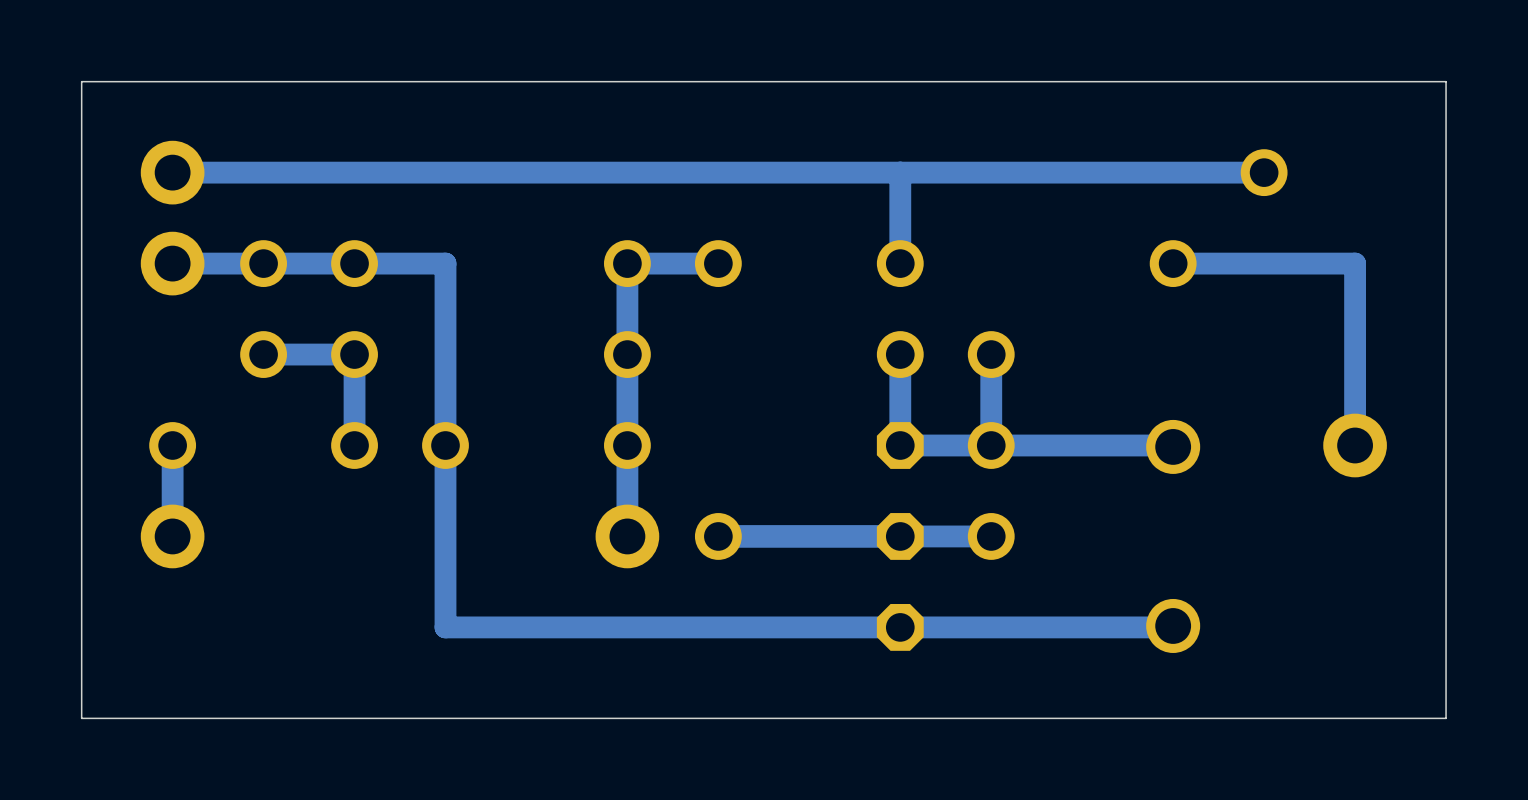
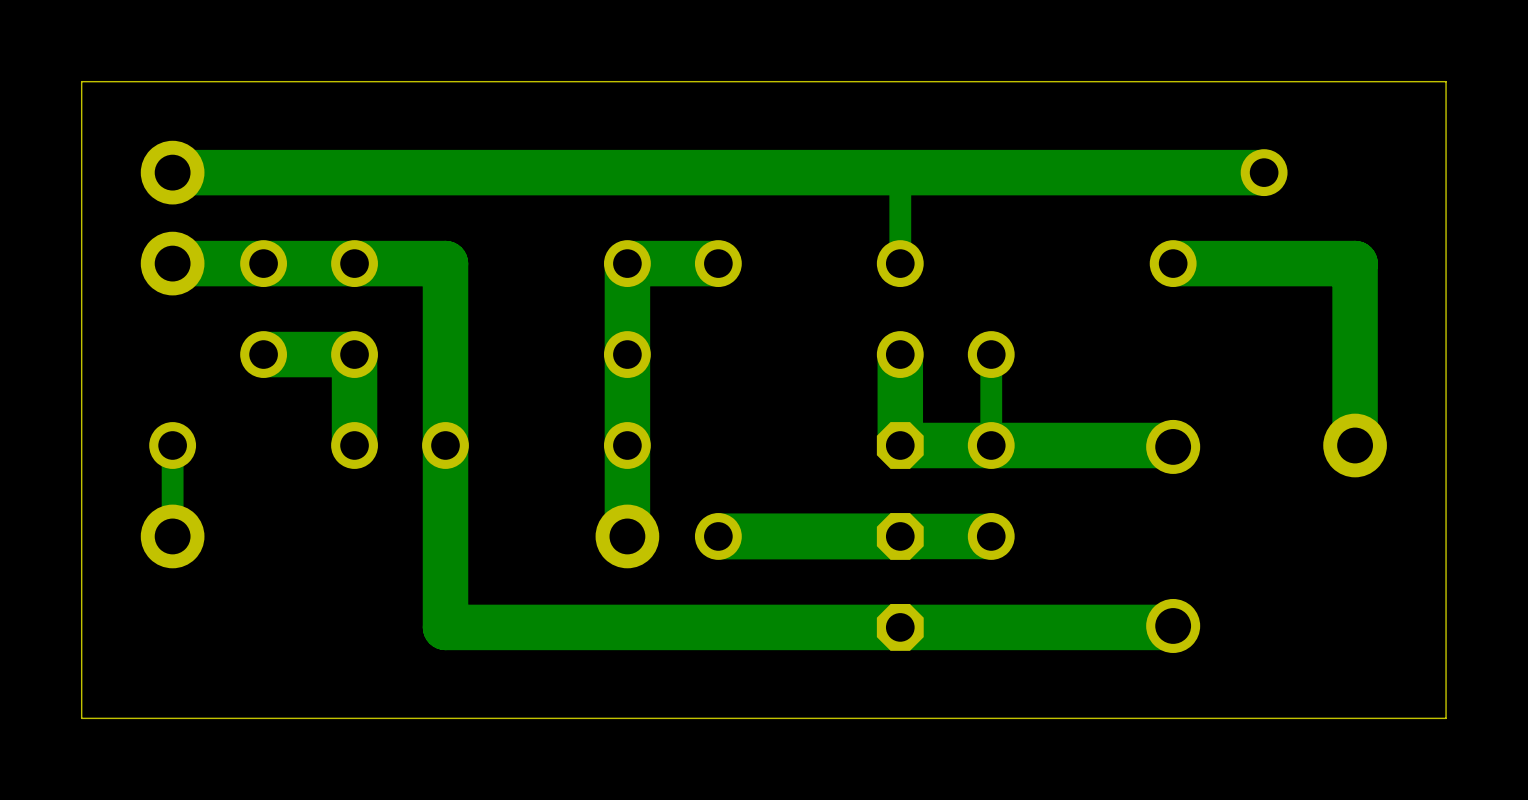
bottom track width: thin (1264, 172) (172, 172) -> thick (1264, 172) (172, 172)
bottom track width: thin (172, 263) (445, 263) (445, 627) (1173, 625) -> thick (172, 263) (445, 263) (445, 627) (1173, 625)
bottom track width: thin (718, 263) (627, 263) (627, 536) -> thick (718, 263) (627, 263) (627, 536)
bottom track width: thin (1173, 263) (1355, 263) (1355, 445) -> thick (1173, 263) (1355, 263) (1355, 445)
bottom track width: thin (263, 354) (354, 354) (354, 445) -> thick (263, 354) (354, 354) (354, 445)
bottom track width: thin (900, 354) (900, 445) (1173, 446) -> thick (900, 354) (900, 445) (1173, 446)
bottom track width: thin (991, 536) (718, 536) -> thick (991, 536) (718, 536)

